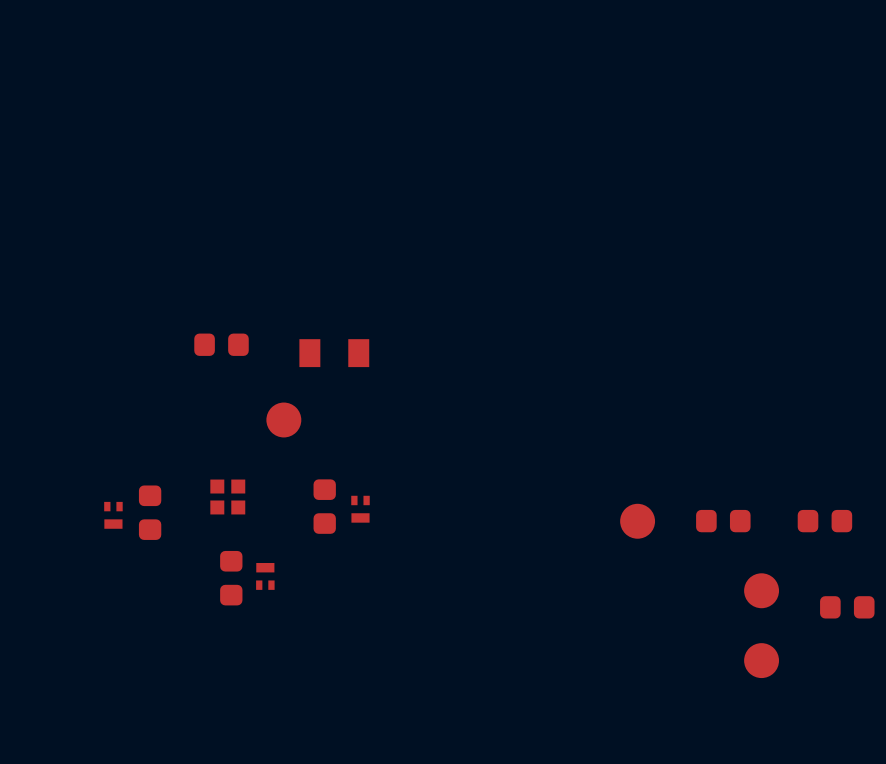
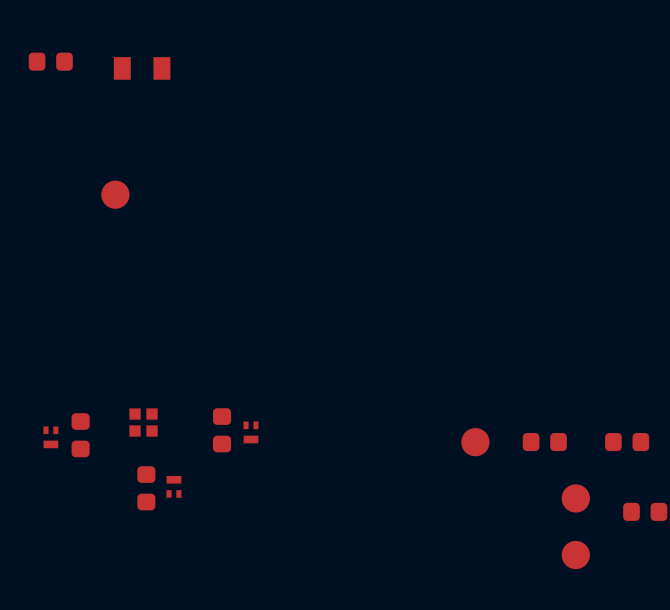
part position: (221, 344) -> (50, 61)
part position: (334, 353) -> (142, 68)
part position: (283, 419) -> (115, 194)

